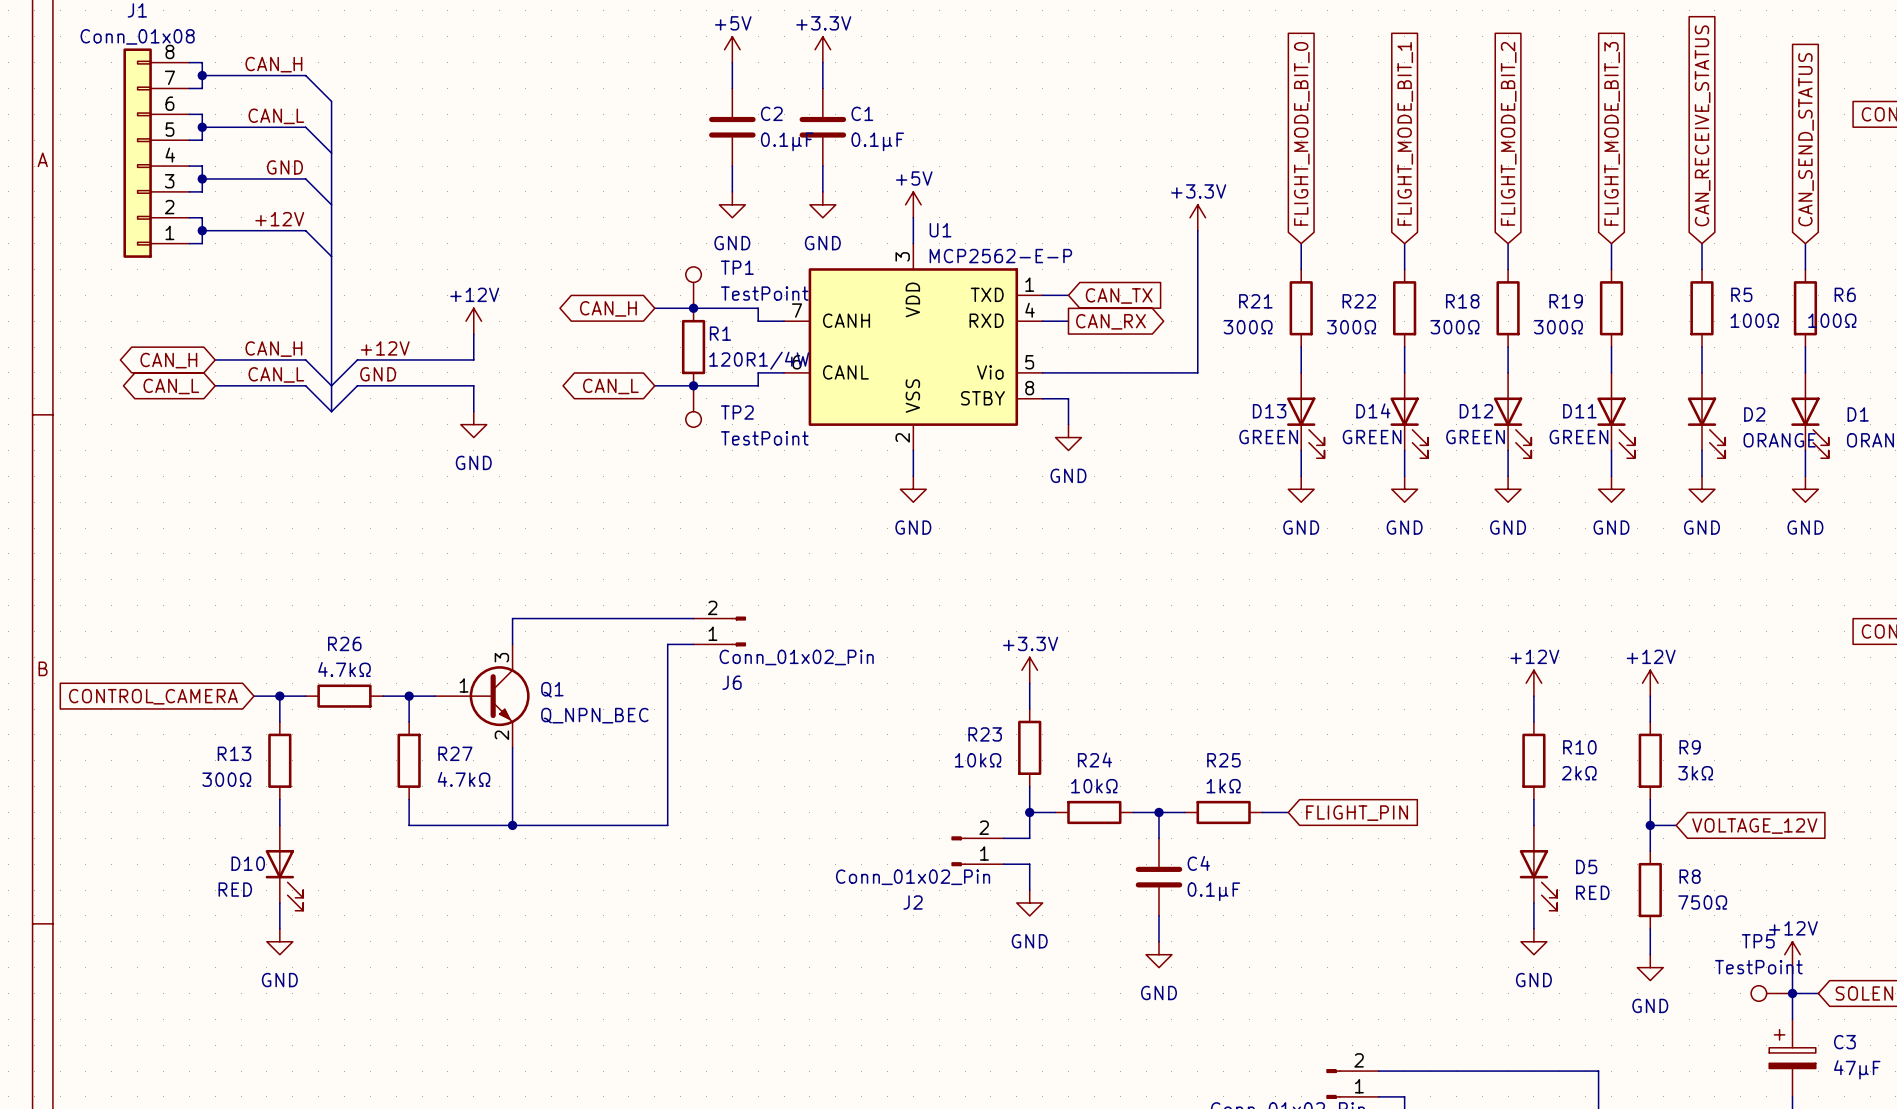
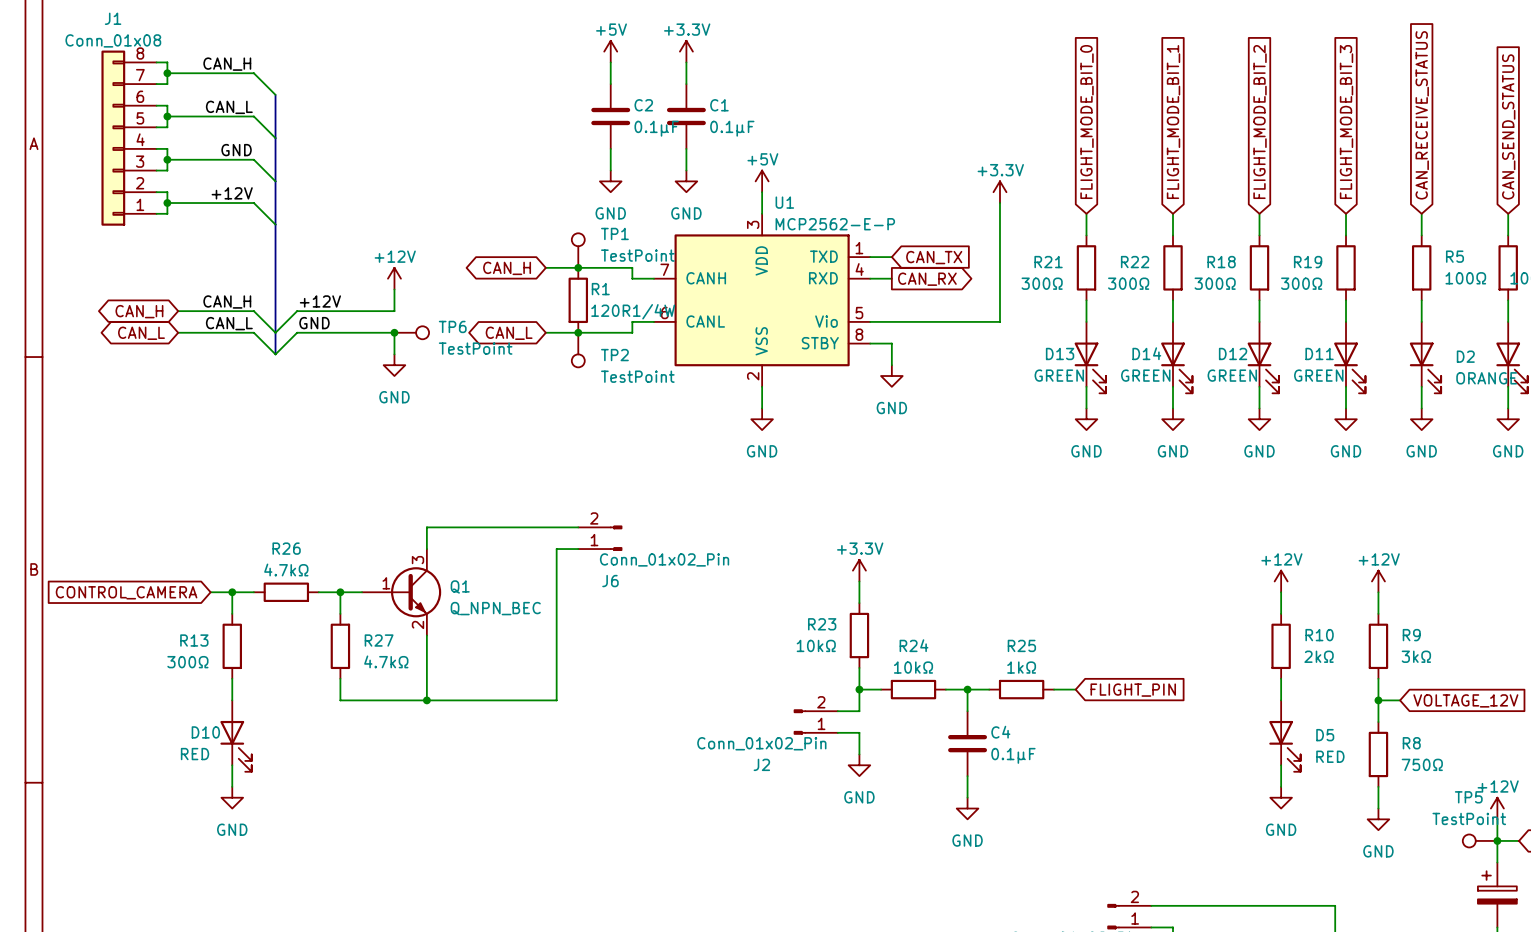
junction: none -> (394, 332)
TP6: none -> TestPoint (411, 332)

